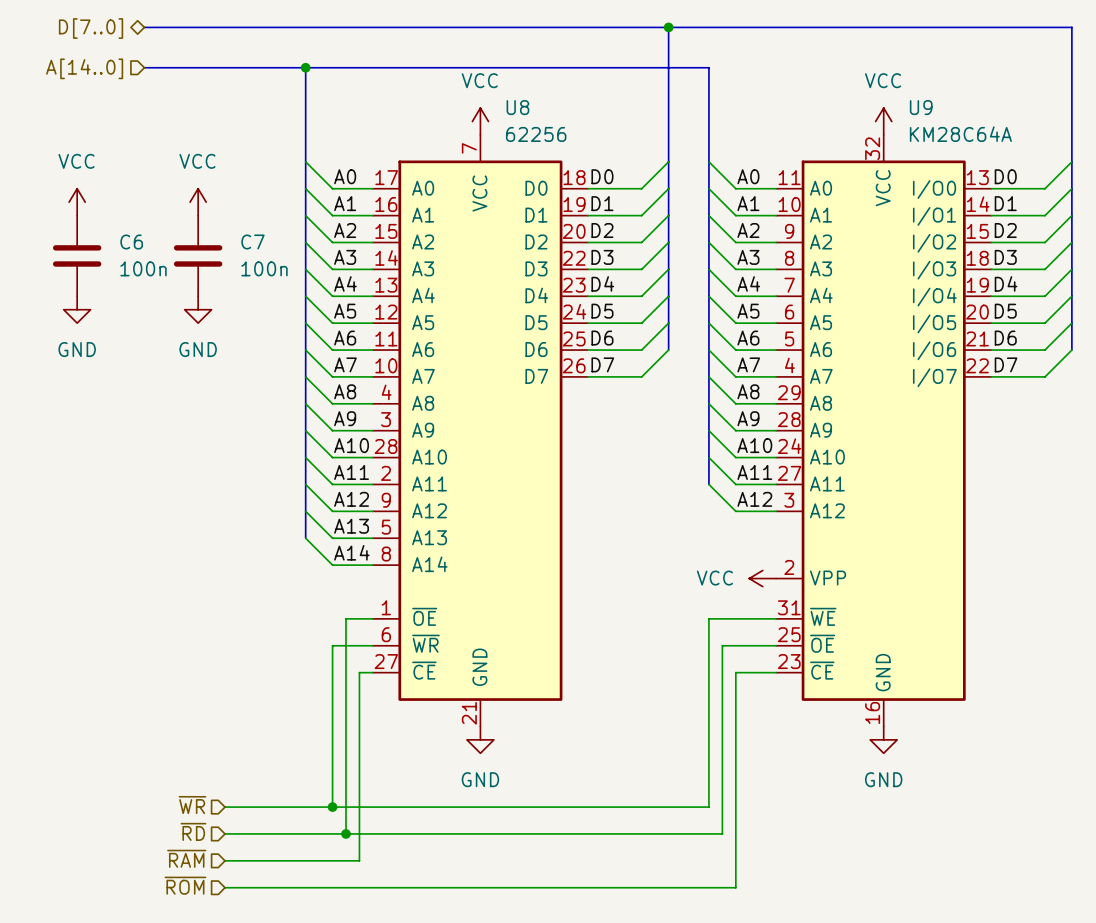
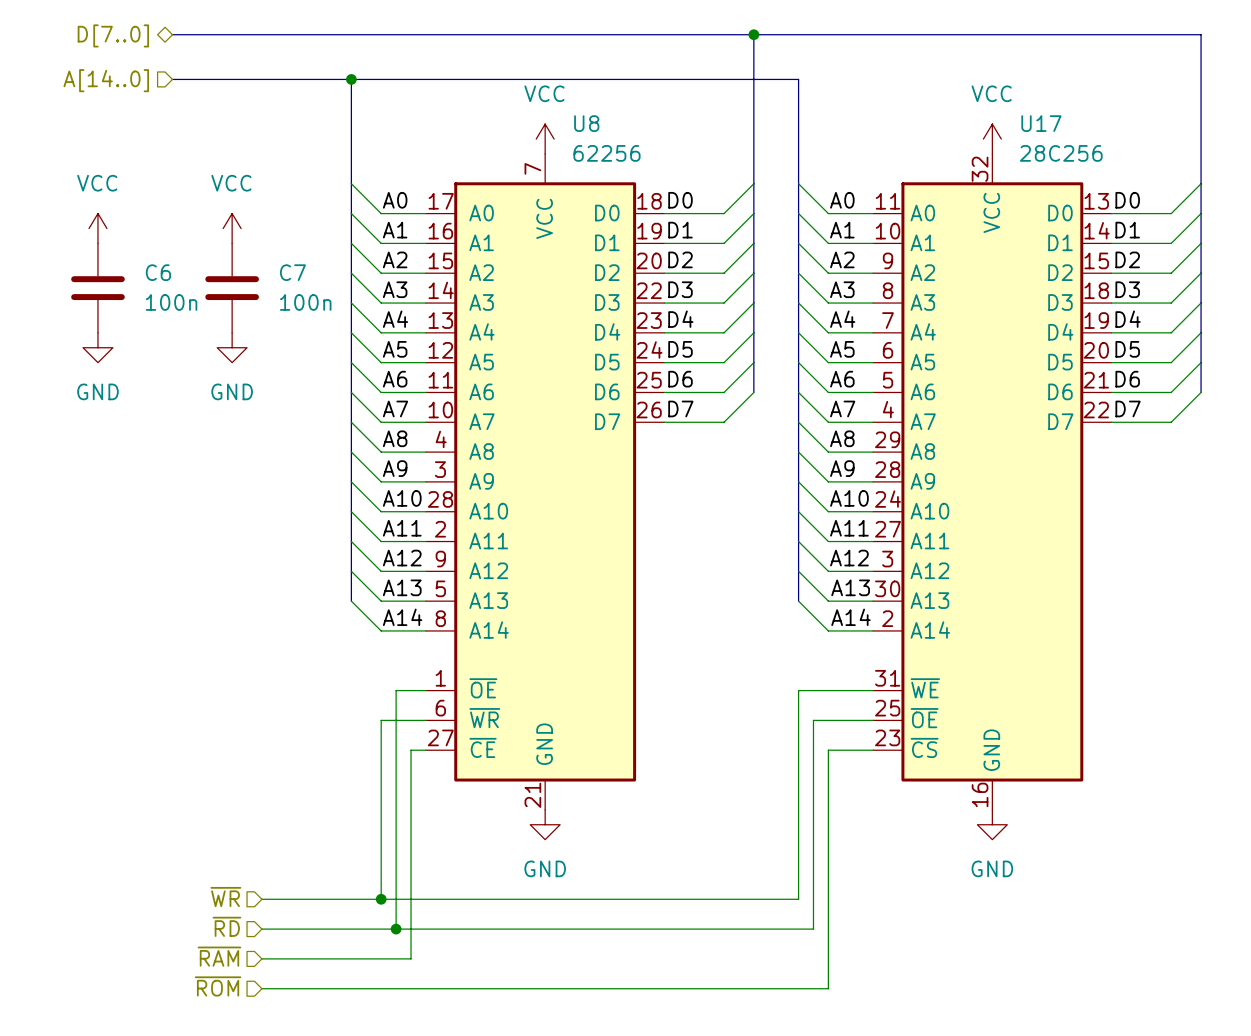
U9: KM28C64A (883, 430) -> none
U17: none -> 28C256 (992, 481)
bus: none -> (798, 541) (798, 601)
wire: none -> (798, 571) (828, 601) (873, 601)
label: none -> A13 (850, 587)
wire: none -> (798, 601) (828, 630) (873, 630)
label: none -> A14 (850, 617)
power symbol: VCC (762, 578) -> none

